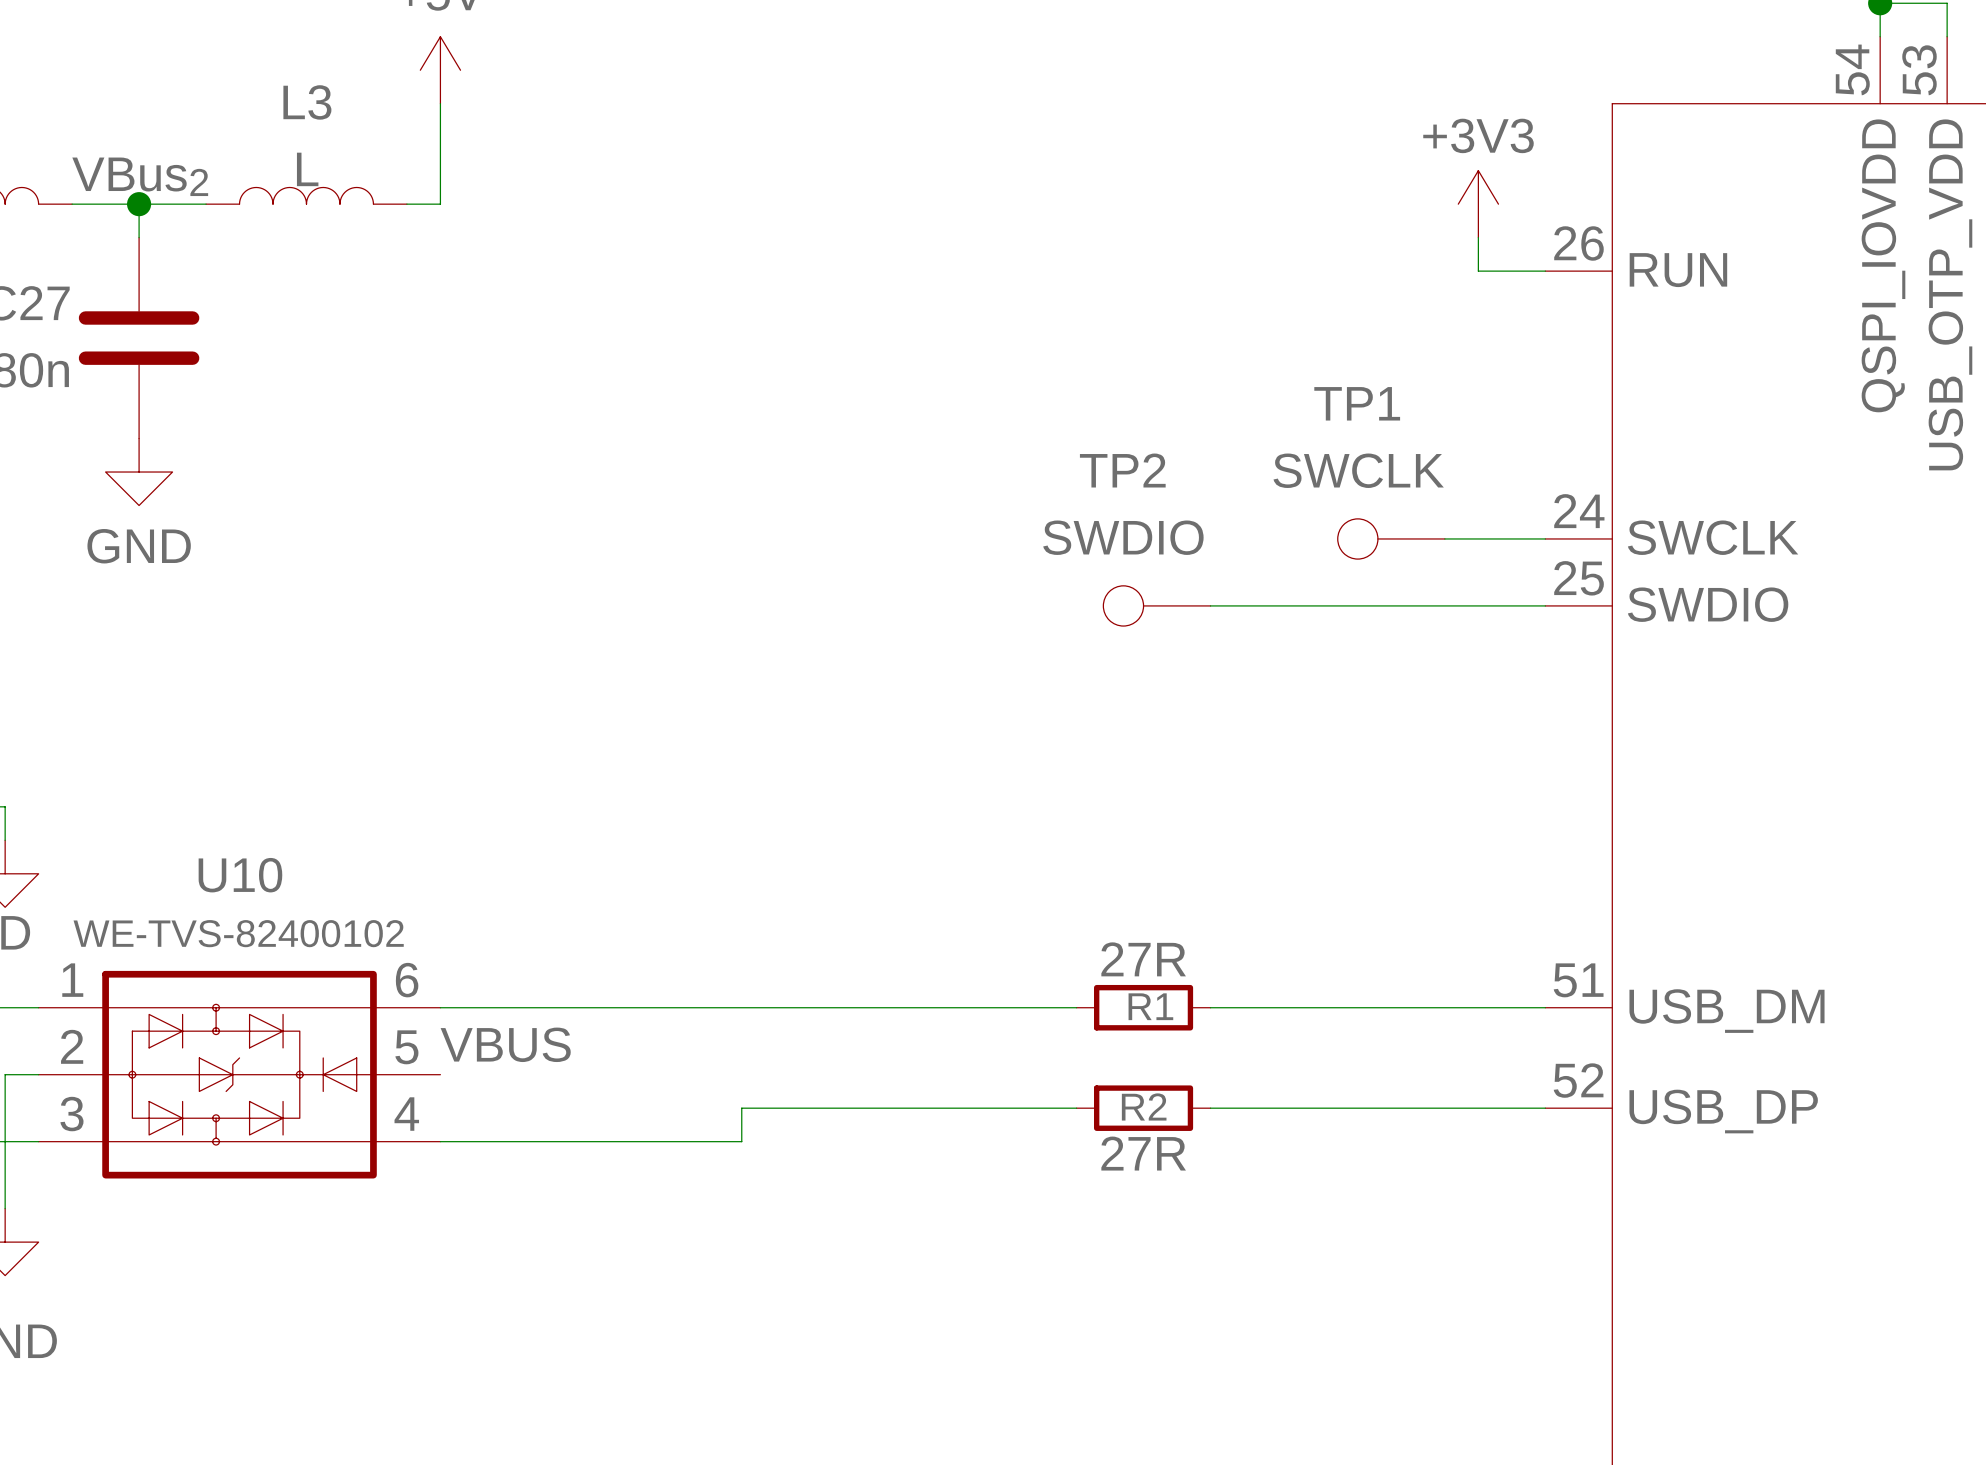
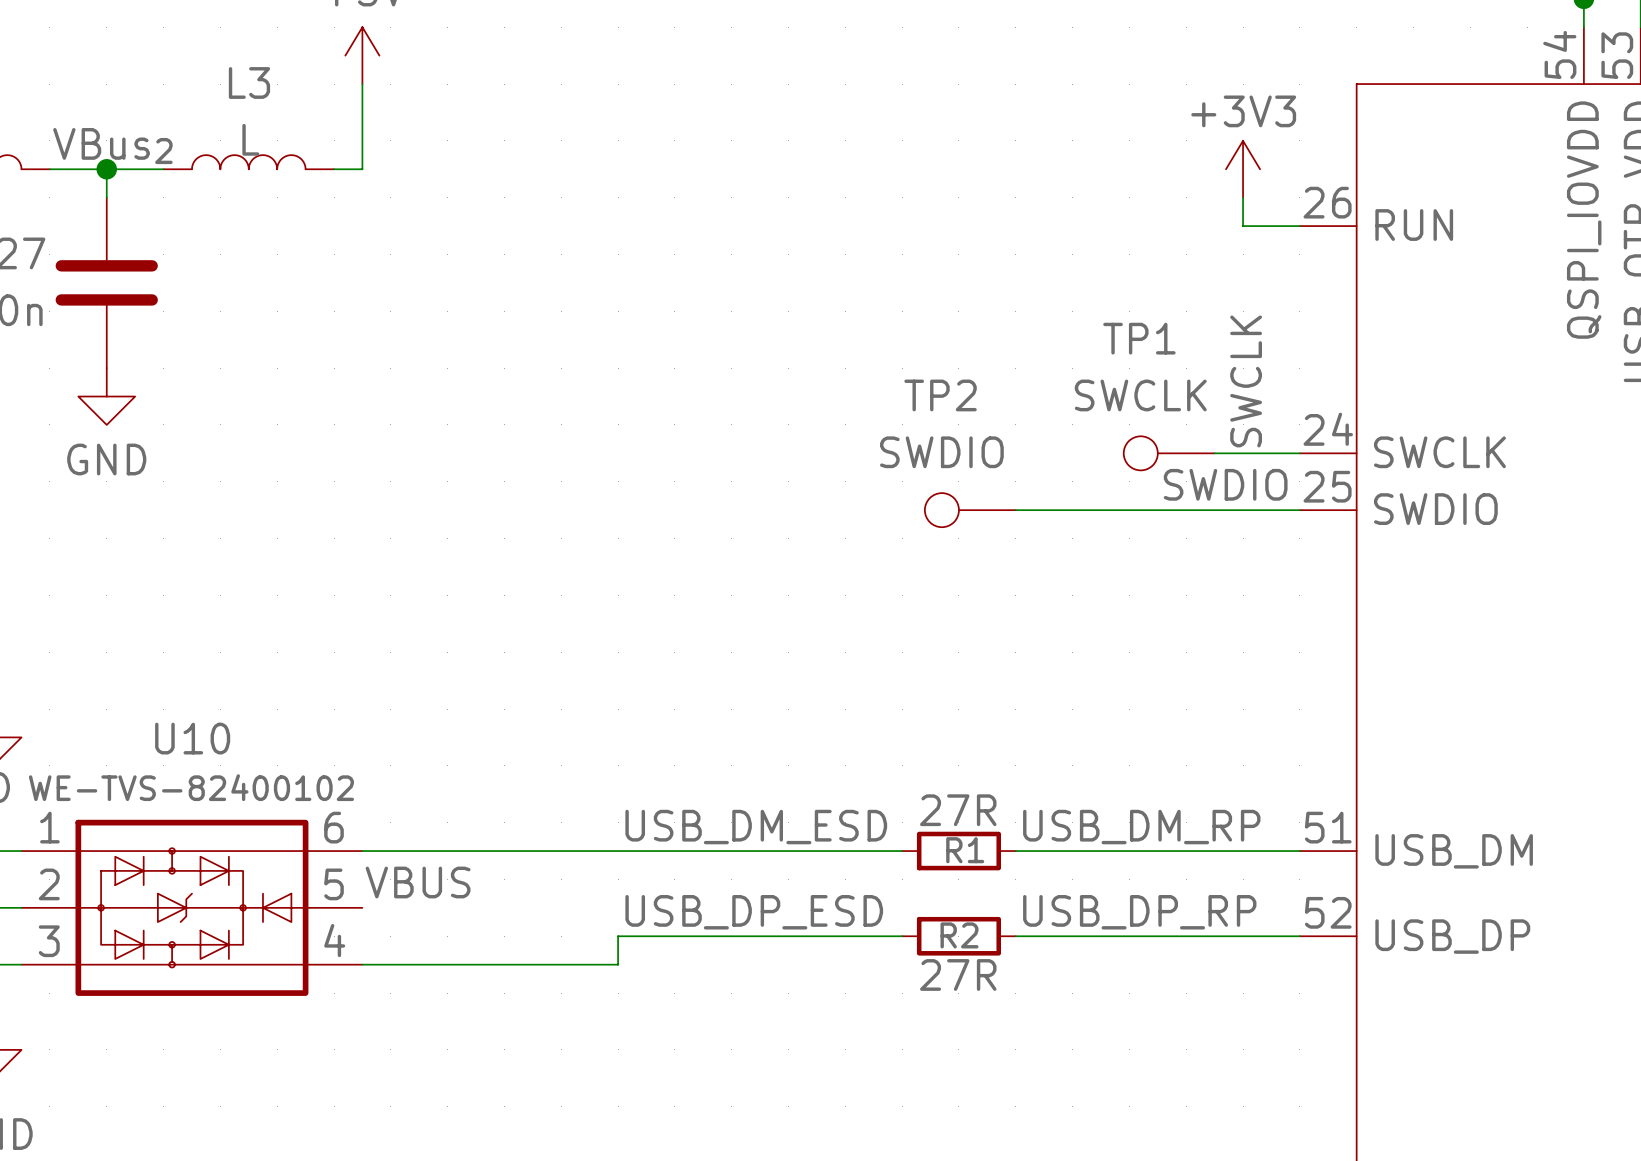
label: none -> SWCLK (1246, 381)
label: none -> SWDIO (1225, 484)
label: none -> USB_DM_ESD (756, 827)
label: none -> USB_DM_RP (1141, 827)
label: none -> USB_DP_ESD (754, 912)
label: none -> USB_DP_RP (1139, 912)

